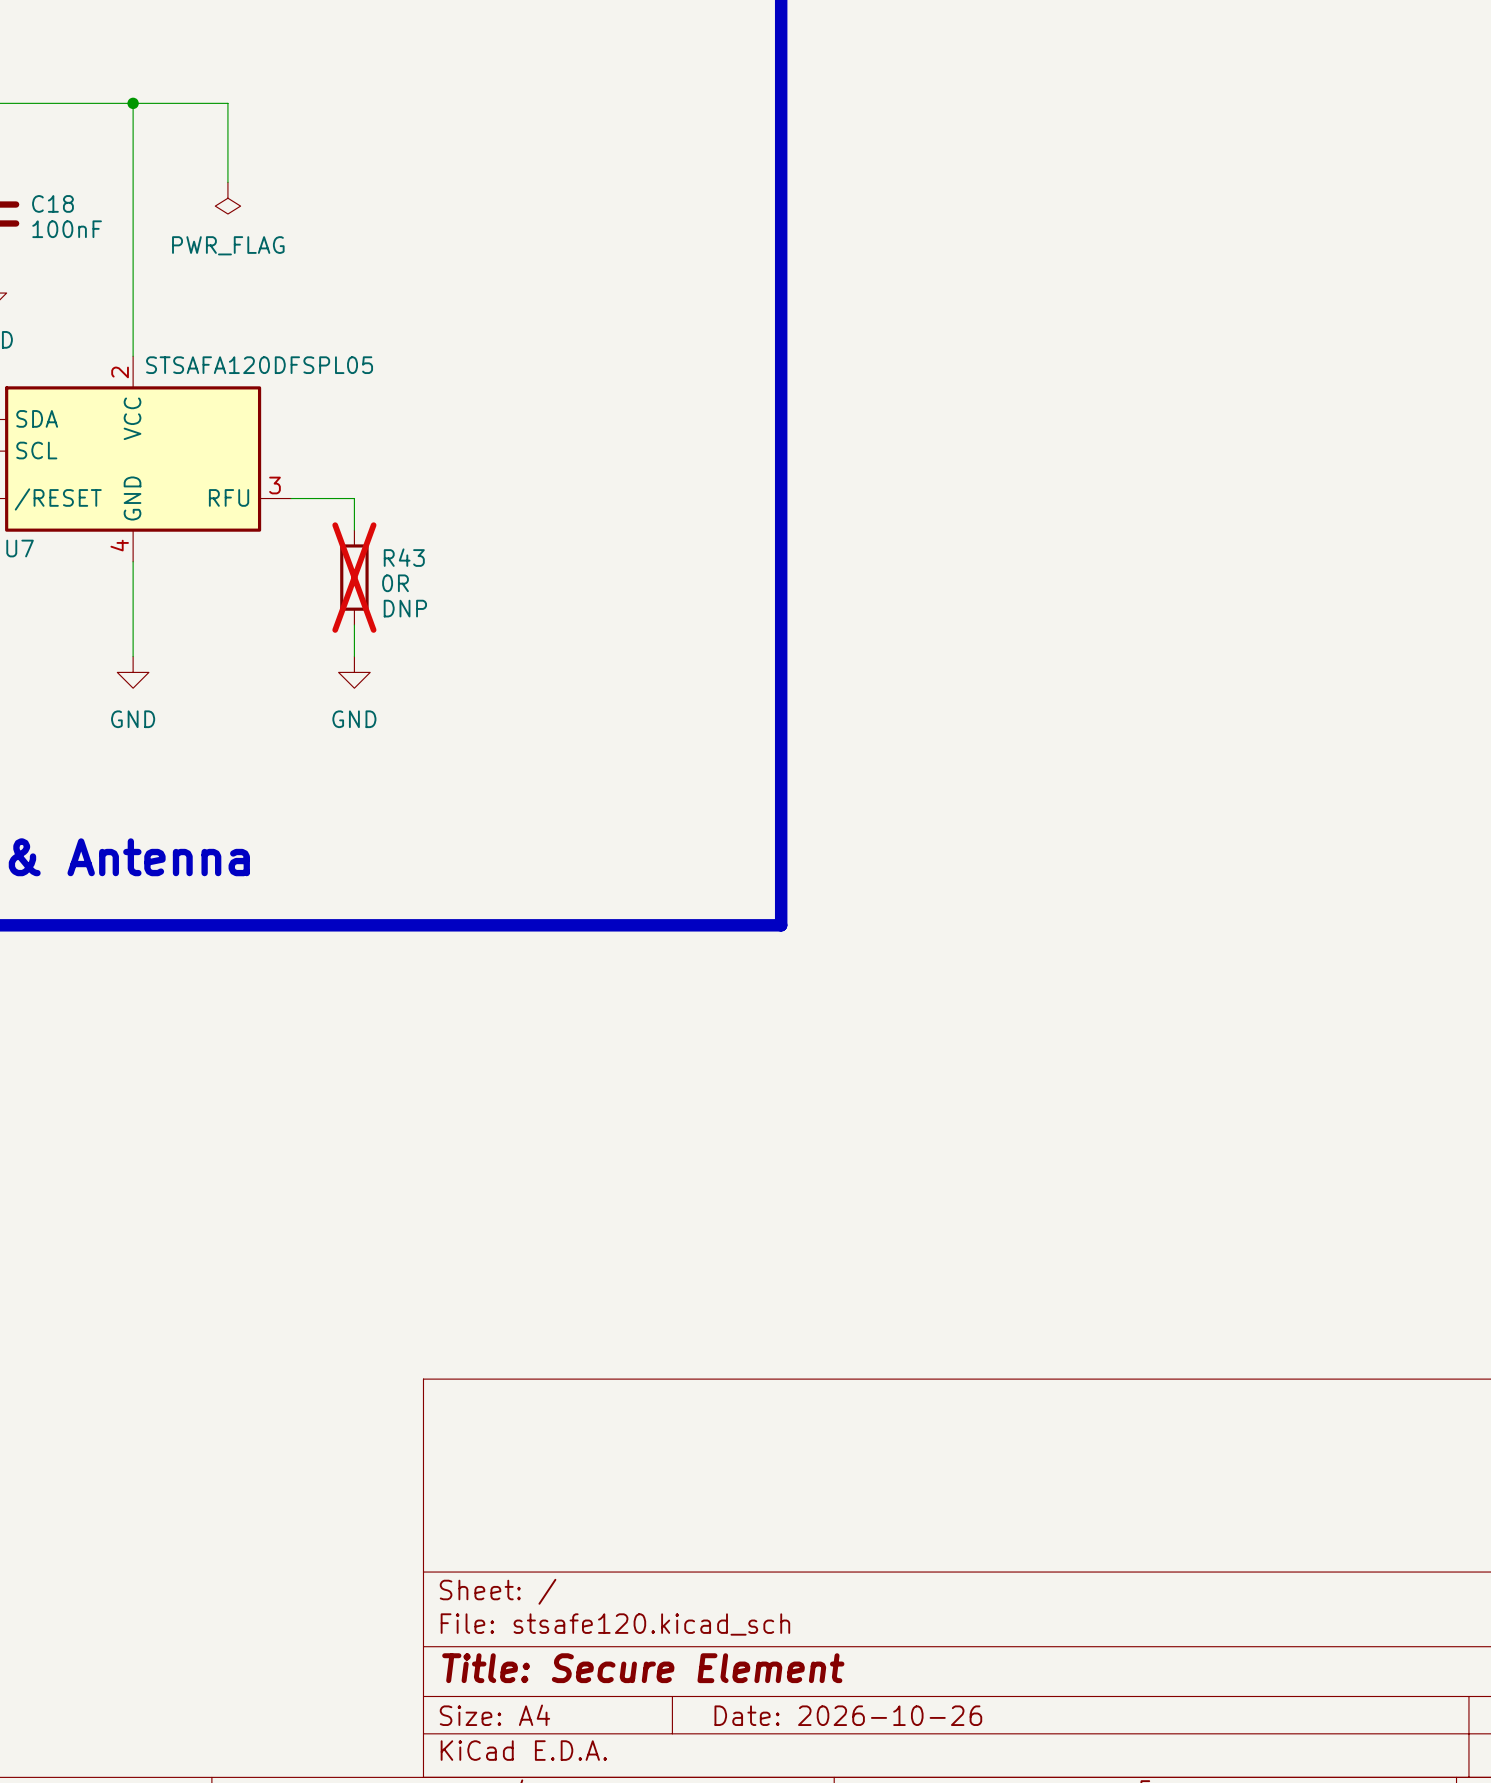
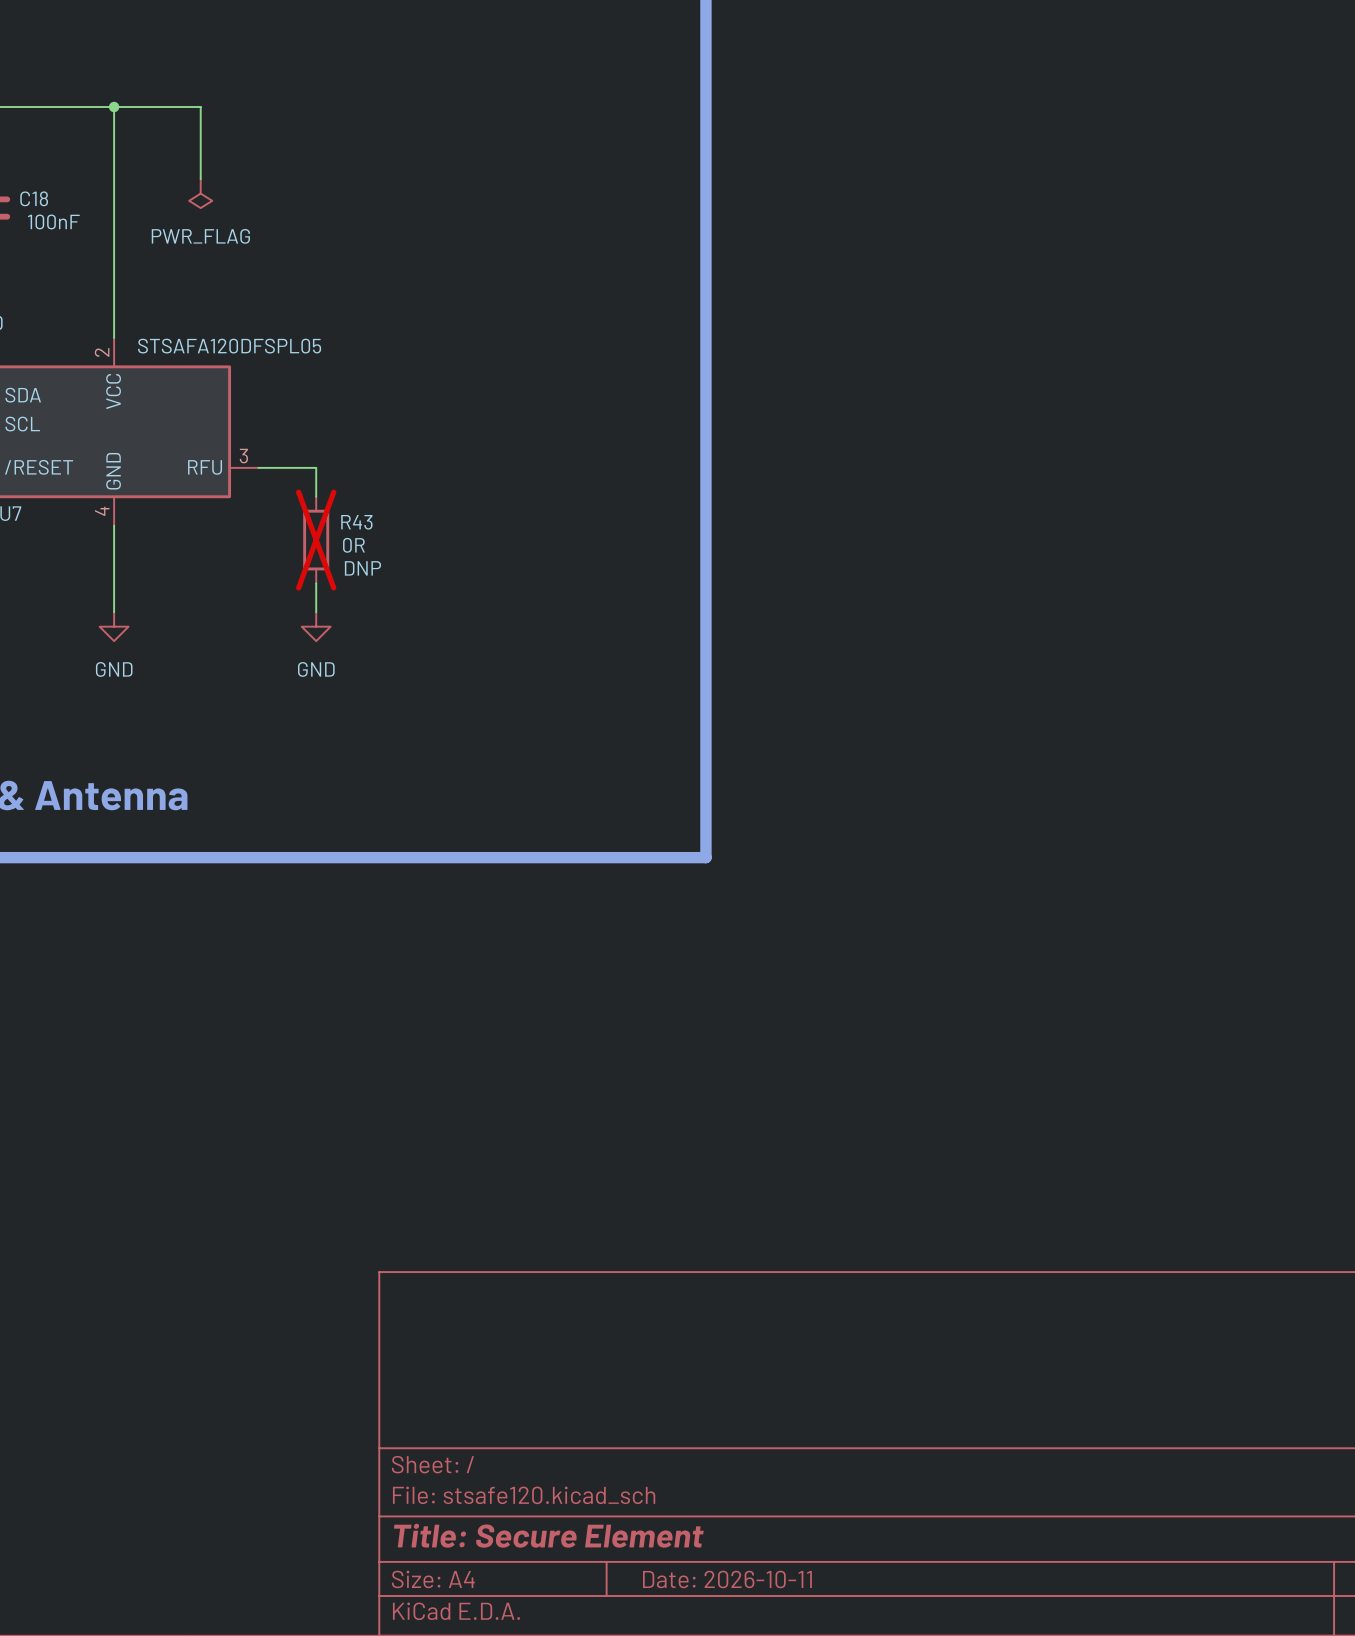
title block: Date: 2026-10-26 (848, 1715) -> Date: 2026-10-11 (727, 1579)

